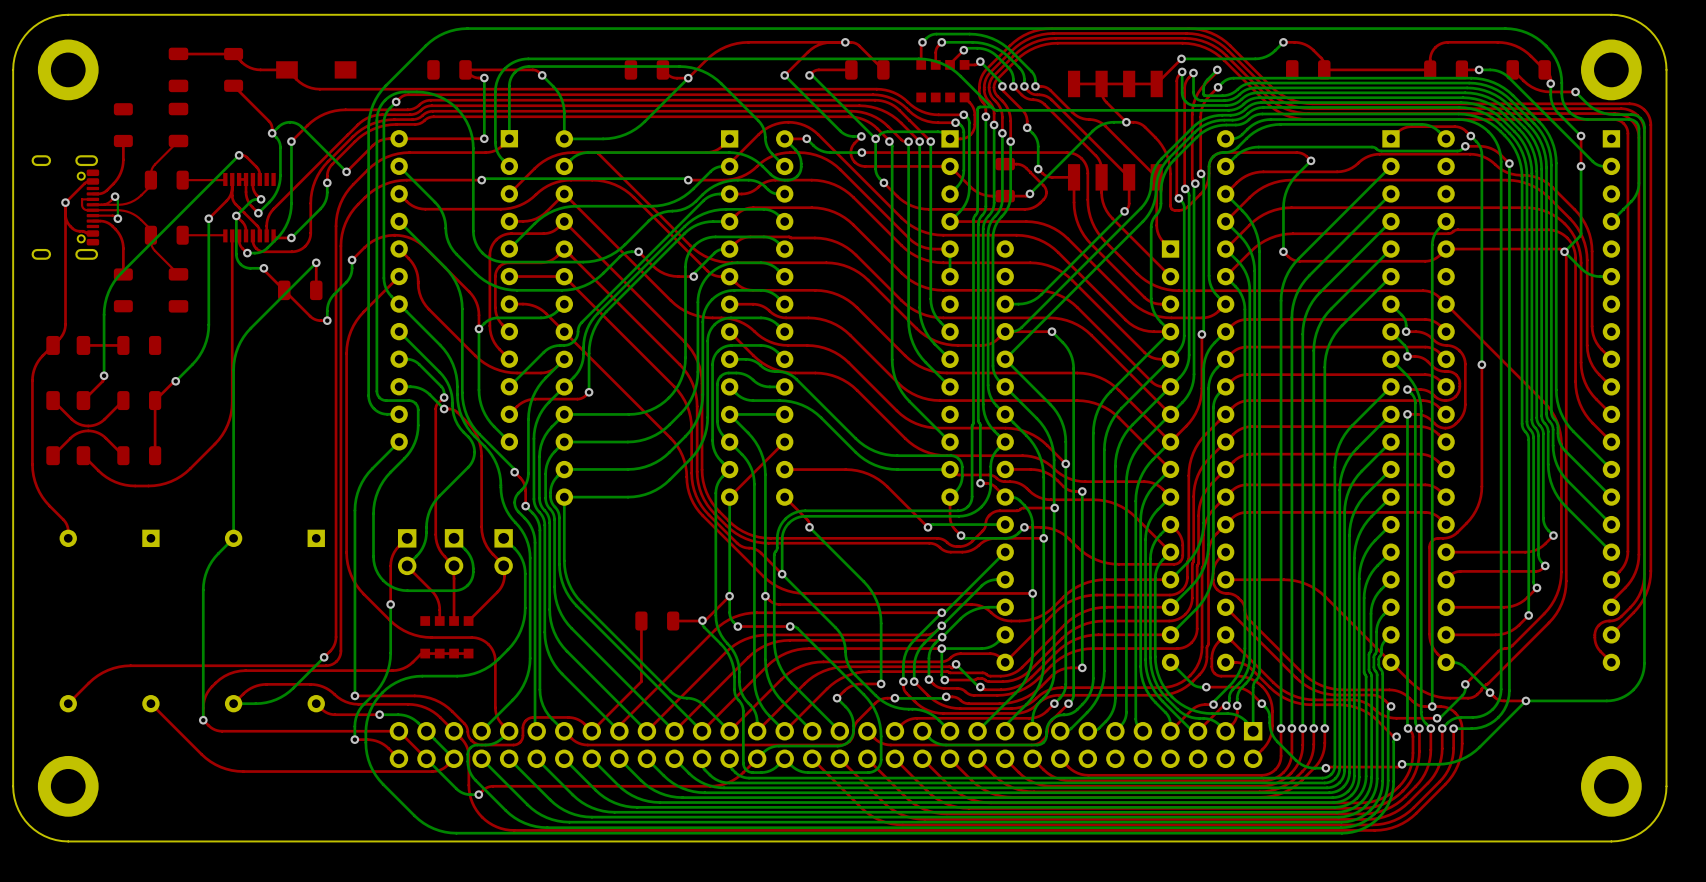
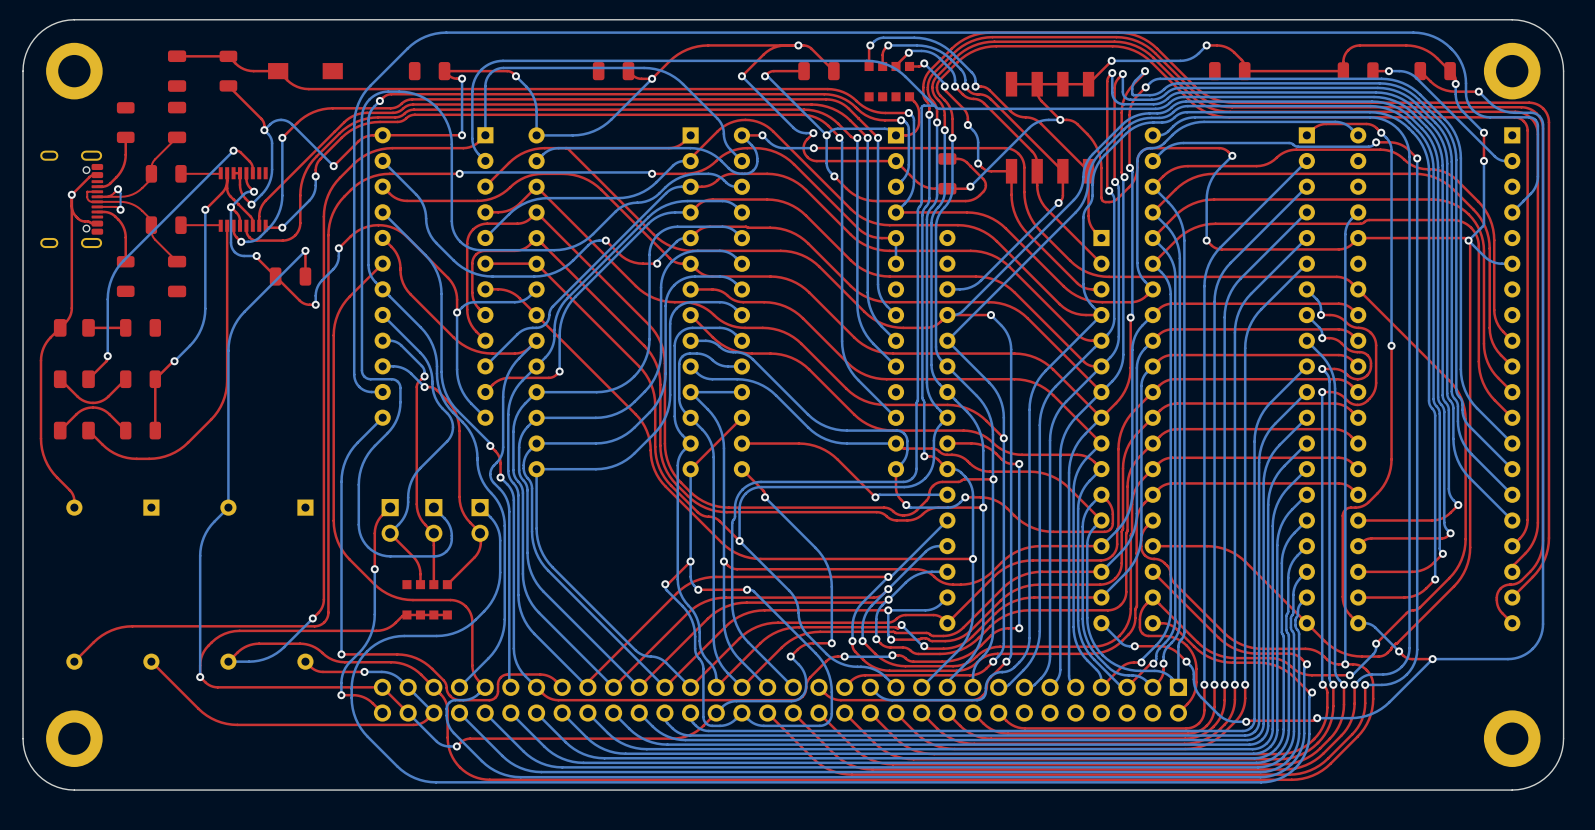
top track: (702, 620) (673, 621) -> none
top track: (641, 621) (641, 681) (591, 731) -> none
part: (657, 621) -> none

